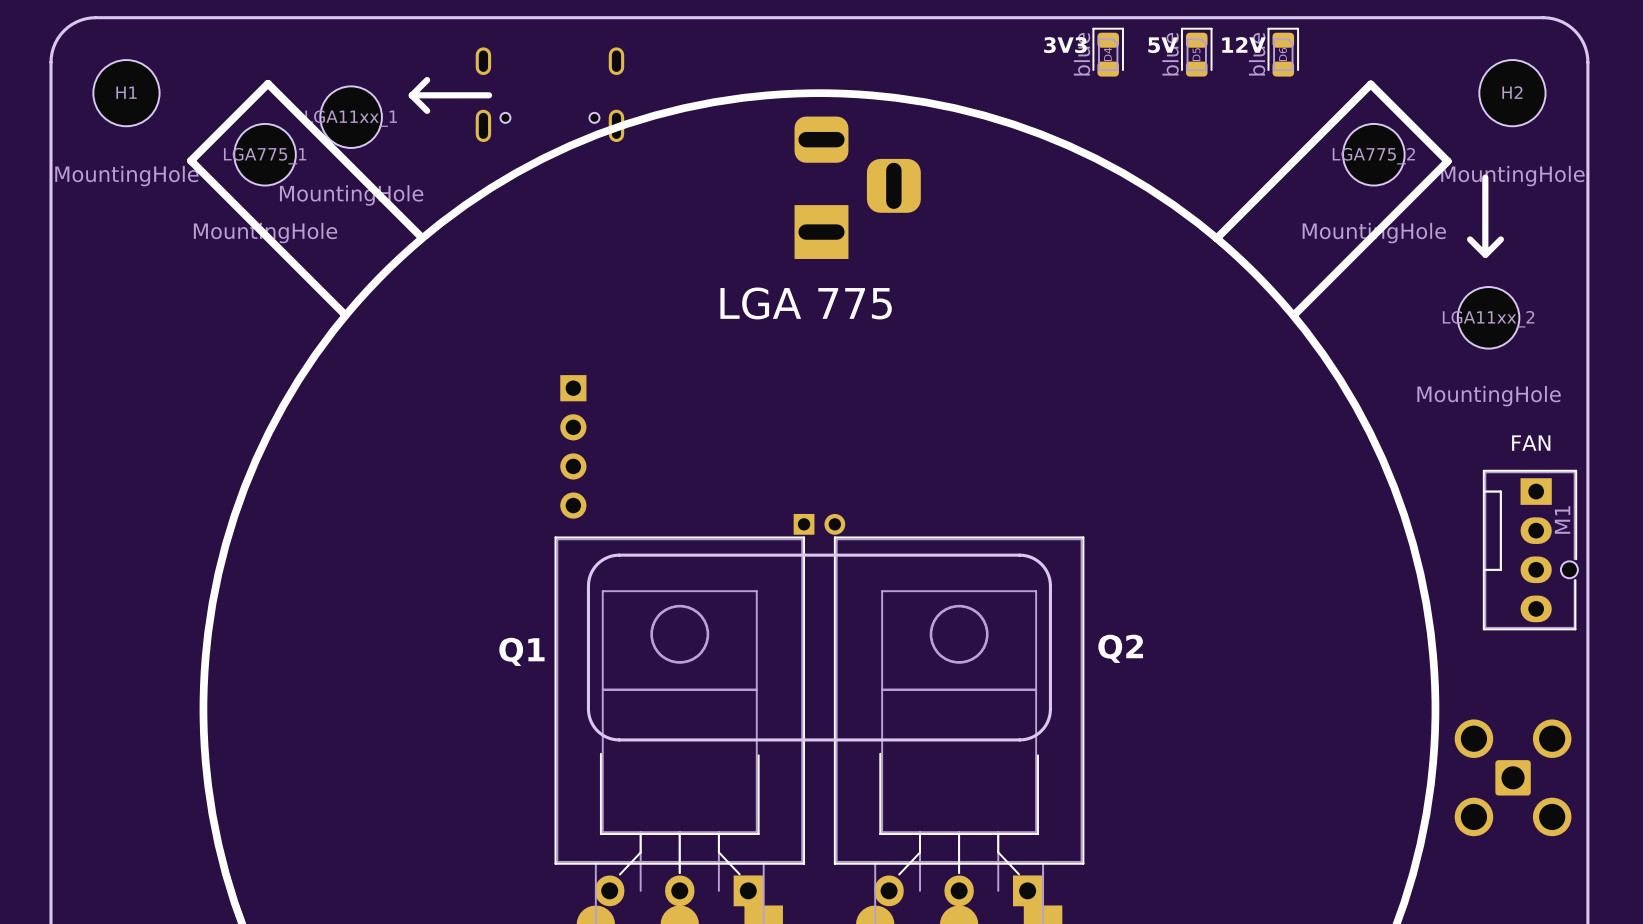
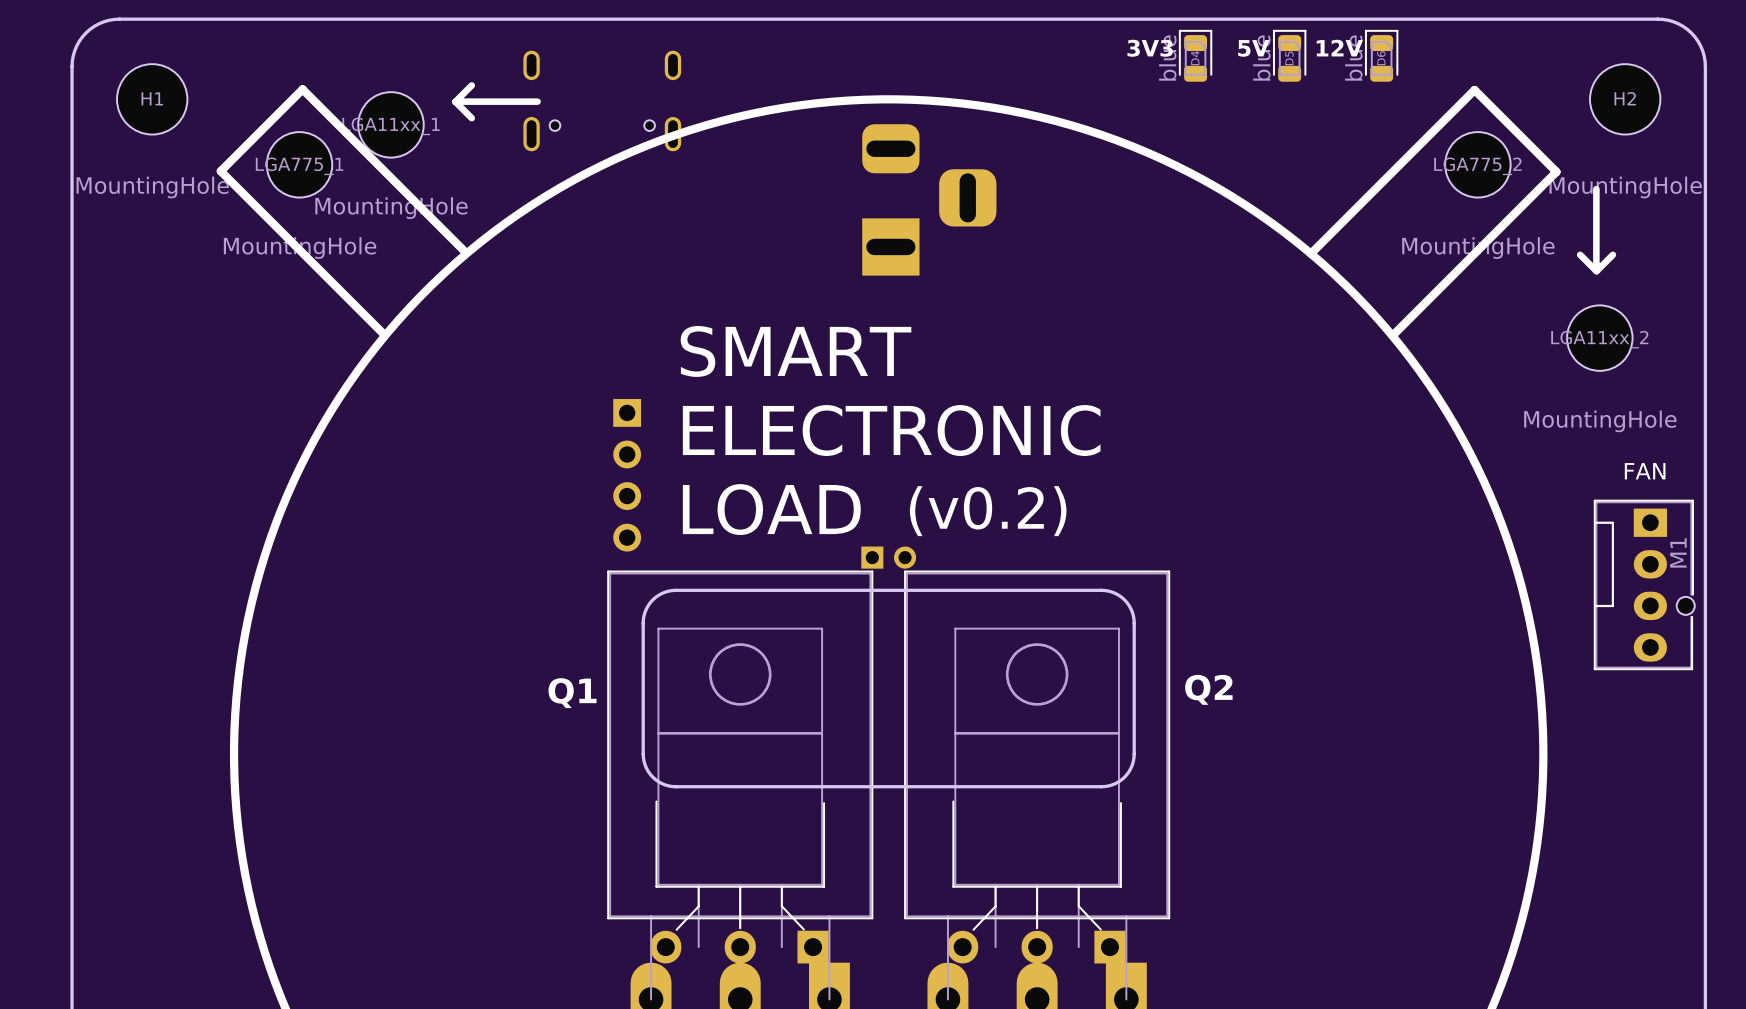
text: LGA 775 (806, 303) -> none
text: none -> SMART (796, 351)
text: none -> ELECTRONIC (891, 430)
text: none -> LOAD (771, 509)
text: none -> (v0.2) (988, 511)
part: (1513, 777) -> none

